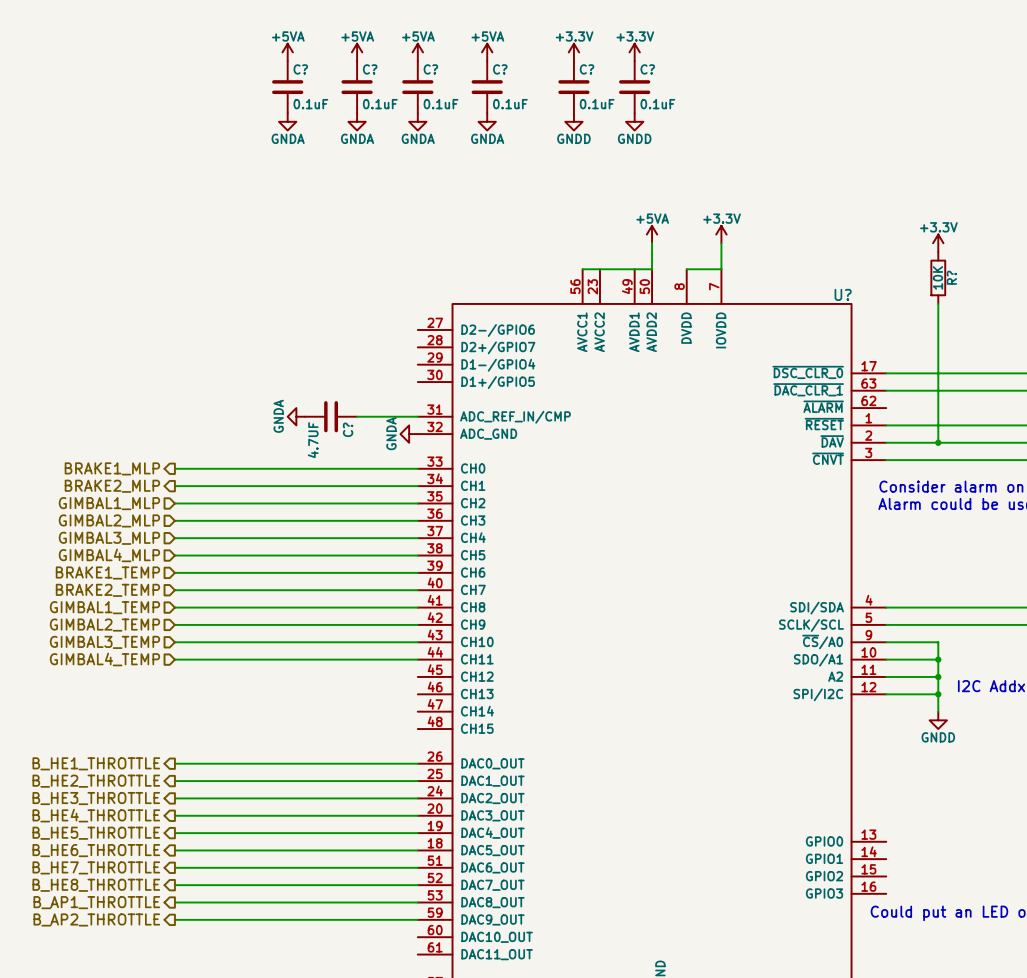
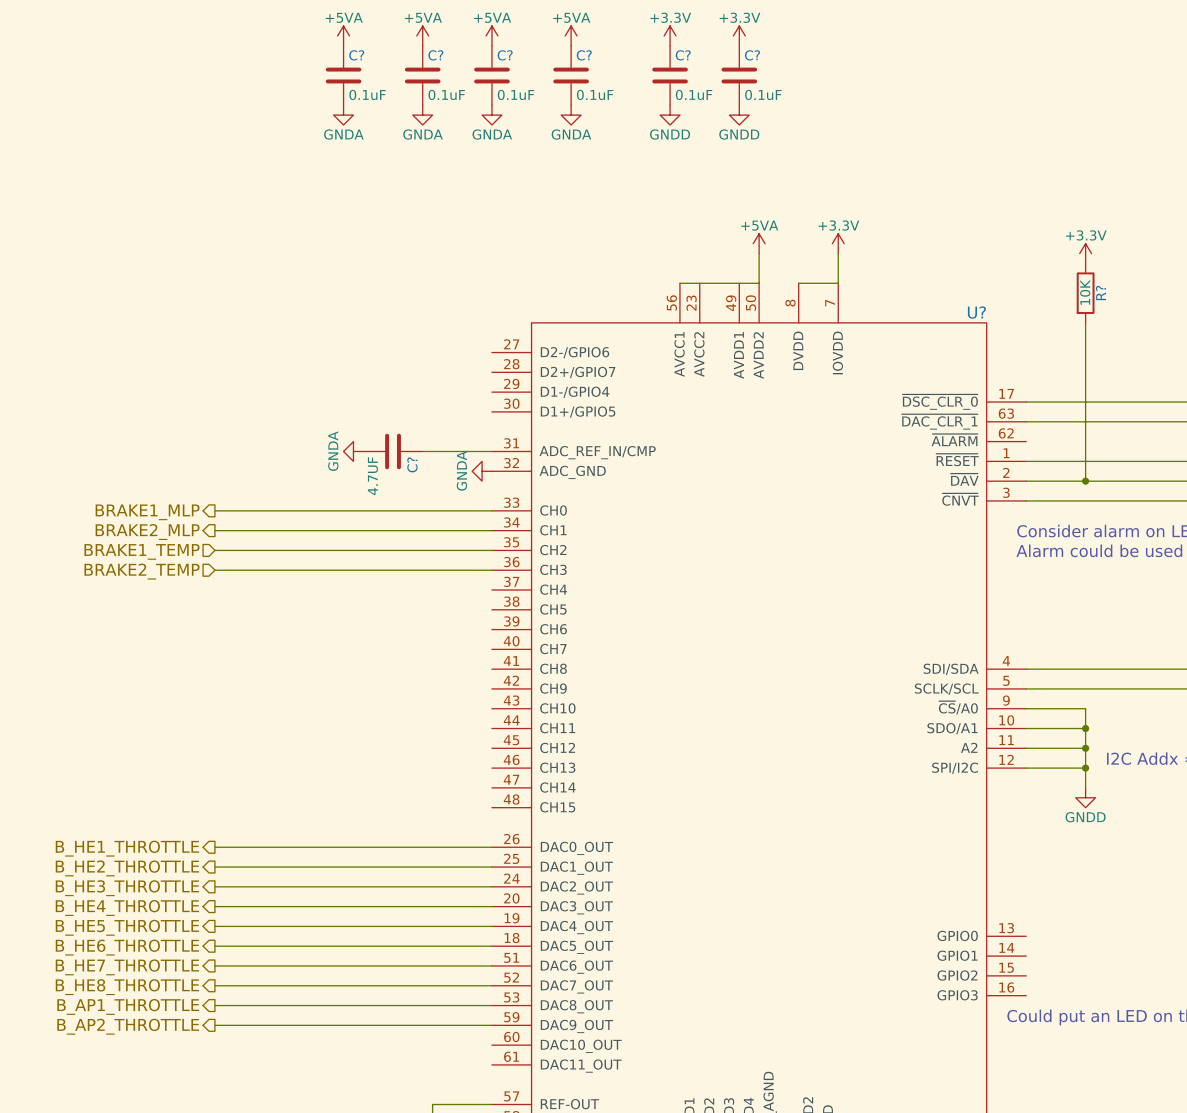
hierarchical label: GIMBAL1_MLP (109, 503) -> BRAKE1_TEMP (142, 551)
hierarchical label: GIMBAL2_MLP (109, 520) -> BRAKE2_TEMP (142, 571)
hierarchical label: GIMBAL3_MLP (109, 538) -> none
wire: (174, 538) (417, 538) -> none
hierarchical label: GIMBAL4_MLP (109, 555) -> none
wire: (174, 555) (417, 555) -> none
hierarchical label: BRAKE1_TEMP (107, 572) -> none
wire: (174, 572) (417, 572) -> none
hierarchical label: BRAKE2_TEMP (107, 590) -> none
wire: (174, 590) (417, 590) -> none
hierarchical label: GIMBAL1_TEMP (104, 607) -> none
wire: (174, 607) (417, 607) -> none
wire: (174, 624) (417, 624) -> none
hierarchical label: GIMBAL2_TEMP (104, 625) -> none
hierarchical label: GIMBAL3_TEMP (104, 642) -> none
wire: (174, 642) (417, 642) -> none
hierarchical label: GIMBAL4_TEMP (104, 659) -> none
wire: (174, 659) (417, 659) -> none

